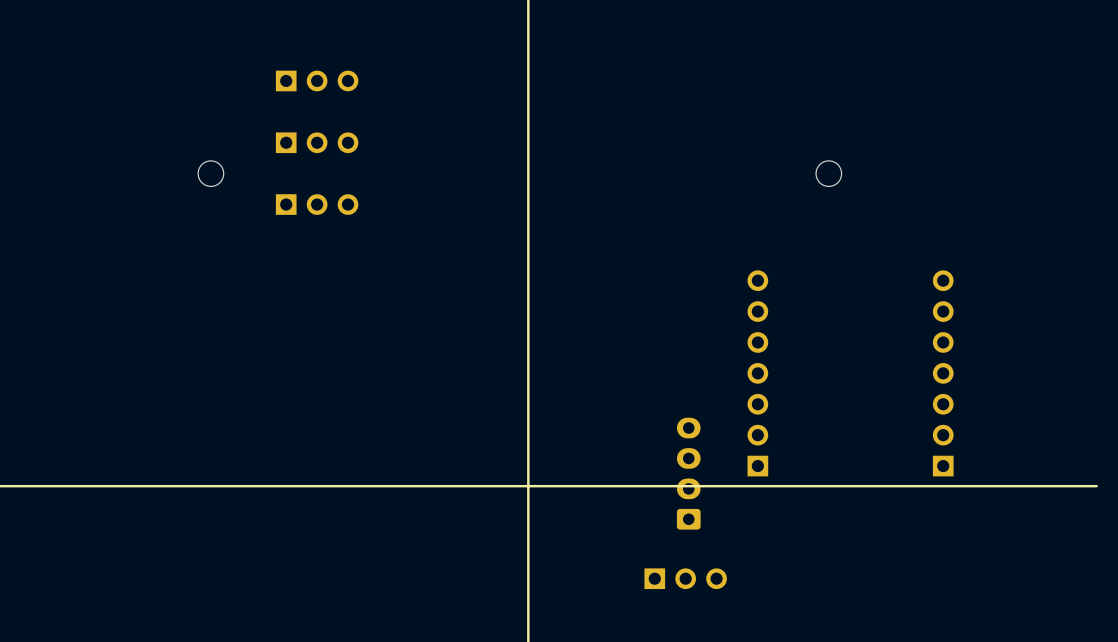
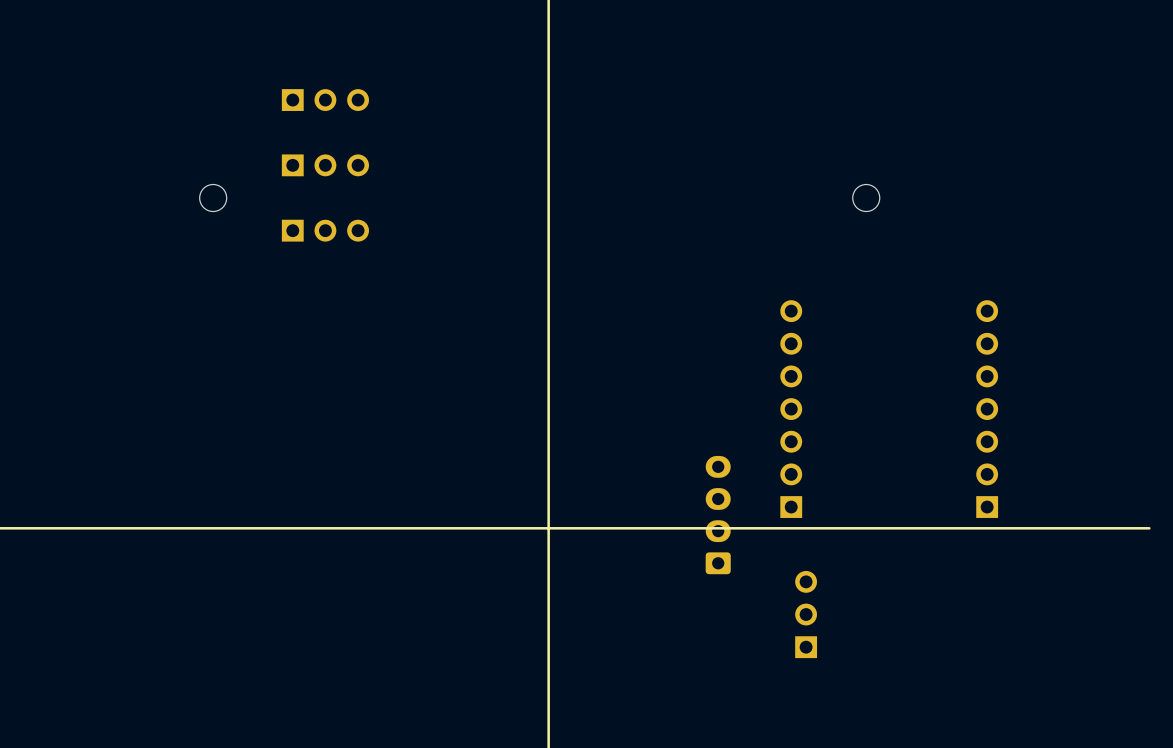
part rotation: 0° (685, 578) -> 90° counterclockwise (806, 614)
part position: (685, 578) -> (806, 614)

